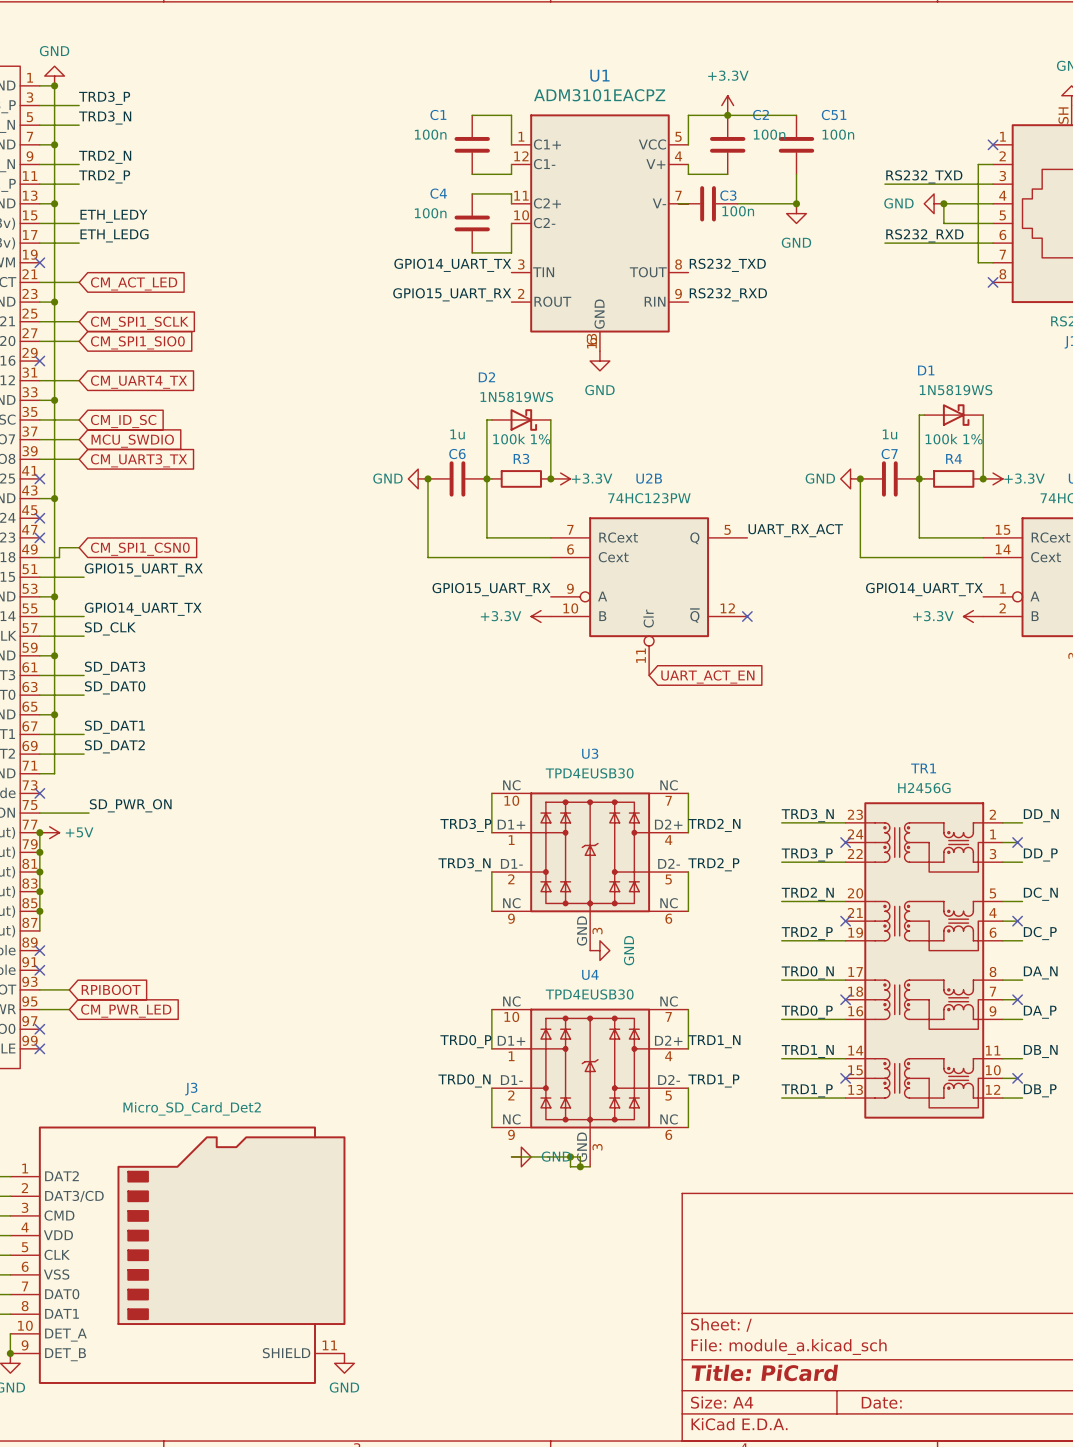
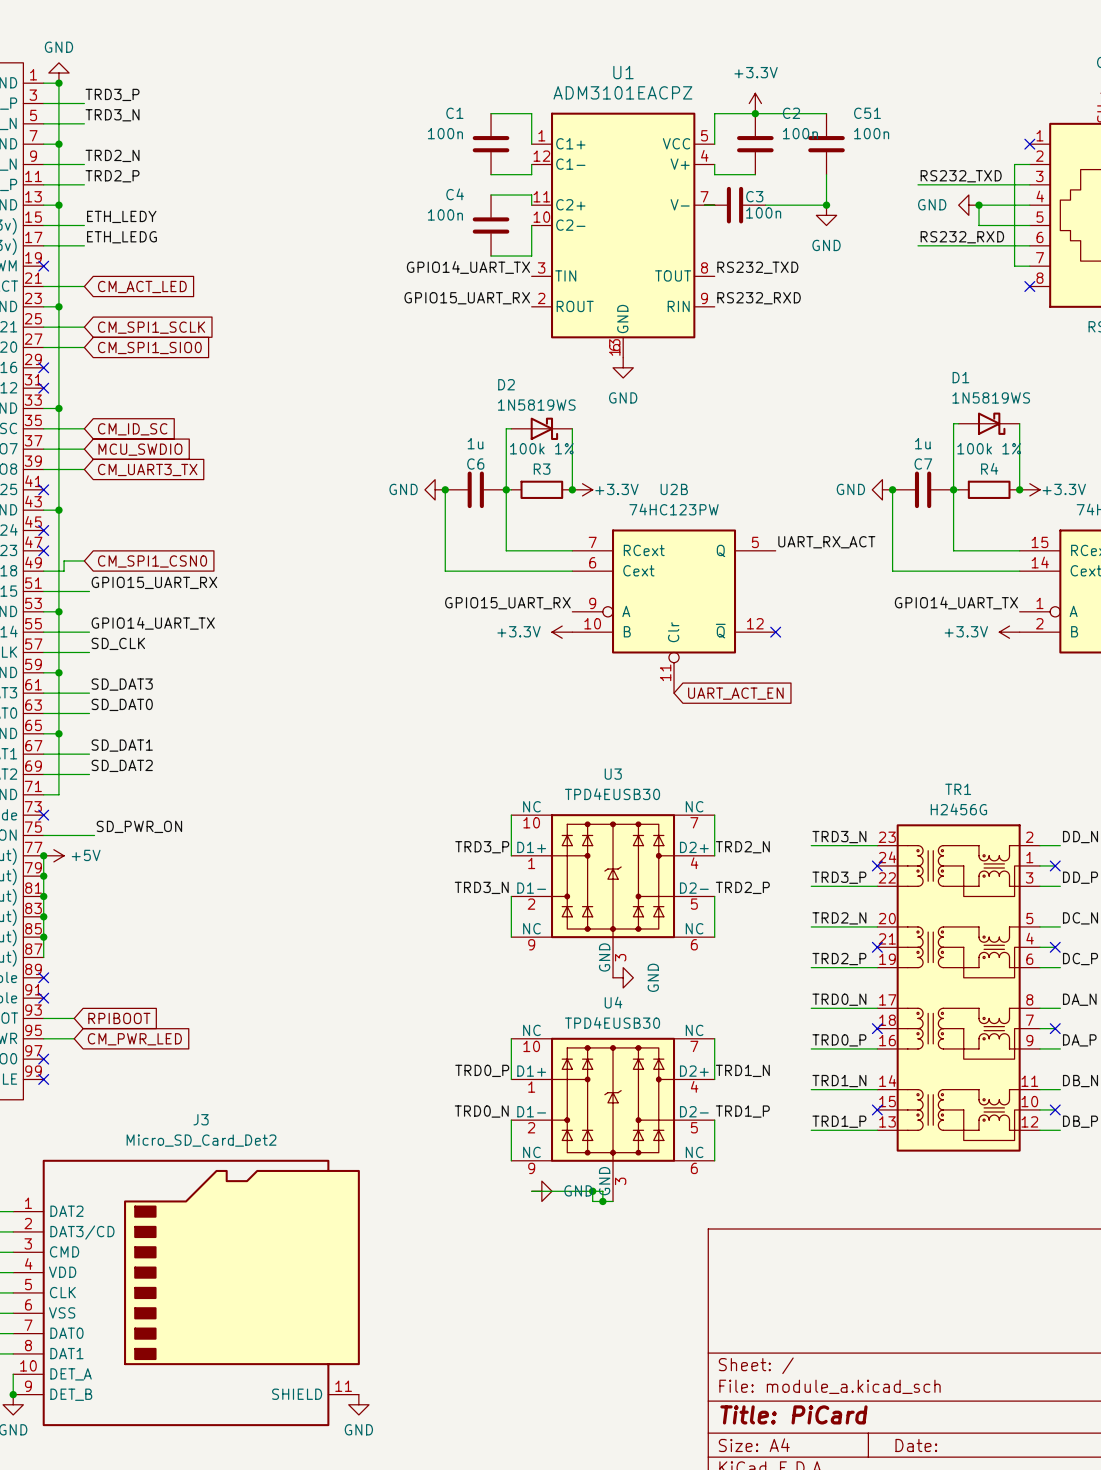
wire: (39, 380) (79, 380) -> none
no-connect mark: none -> (43, 388)
global label: CM_UART4_TX (139, 382) -> none

